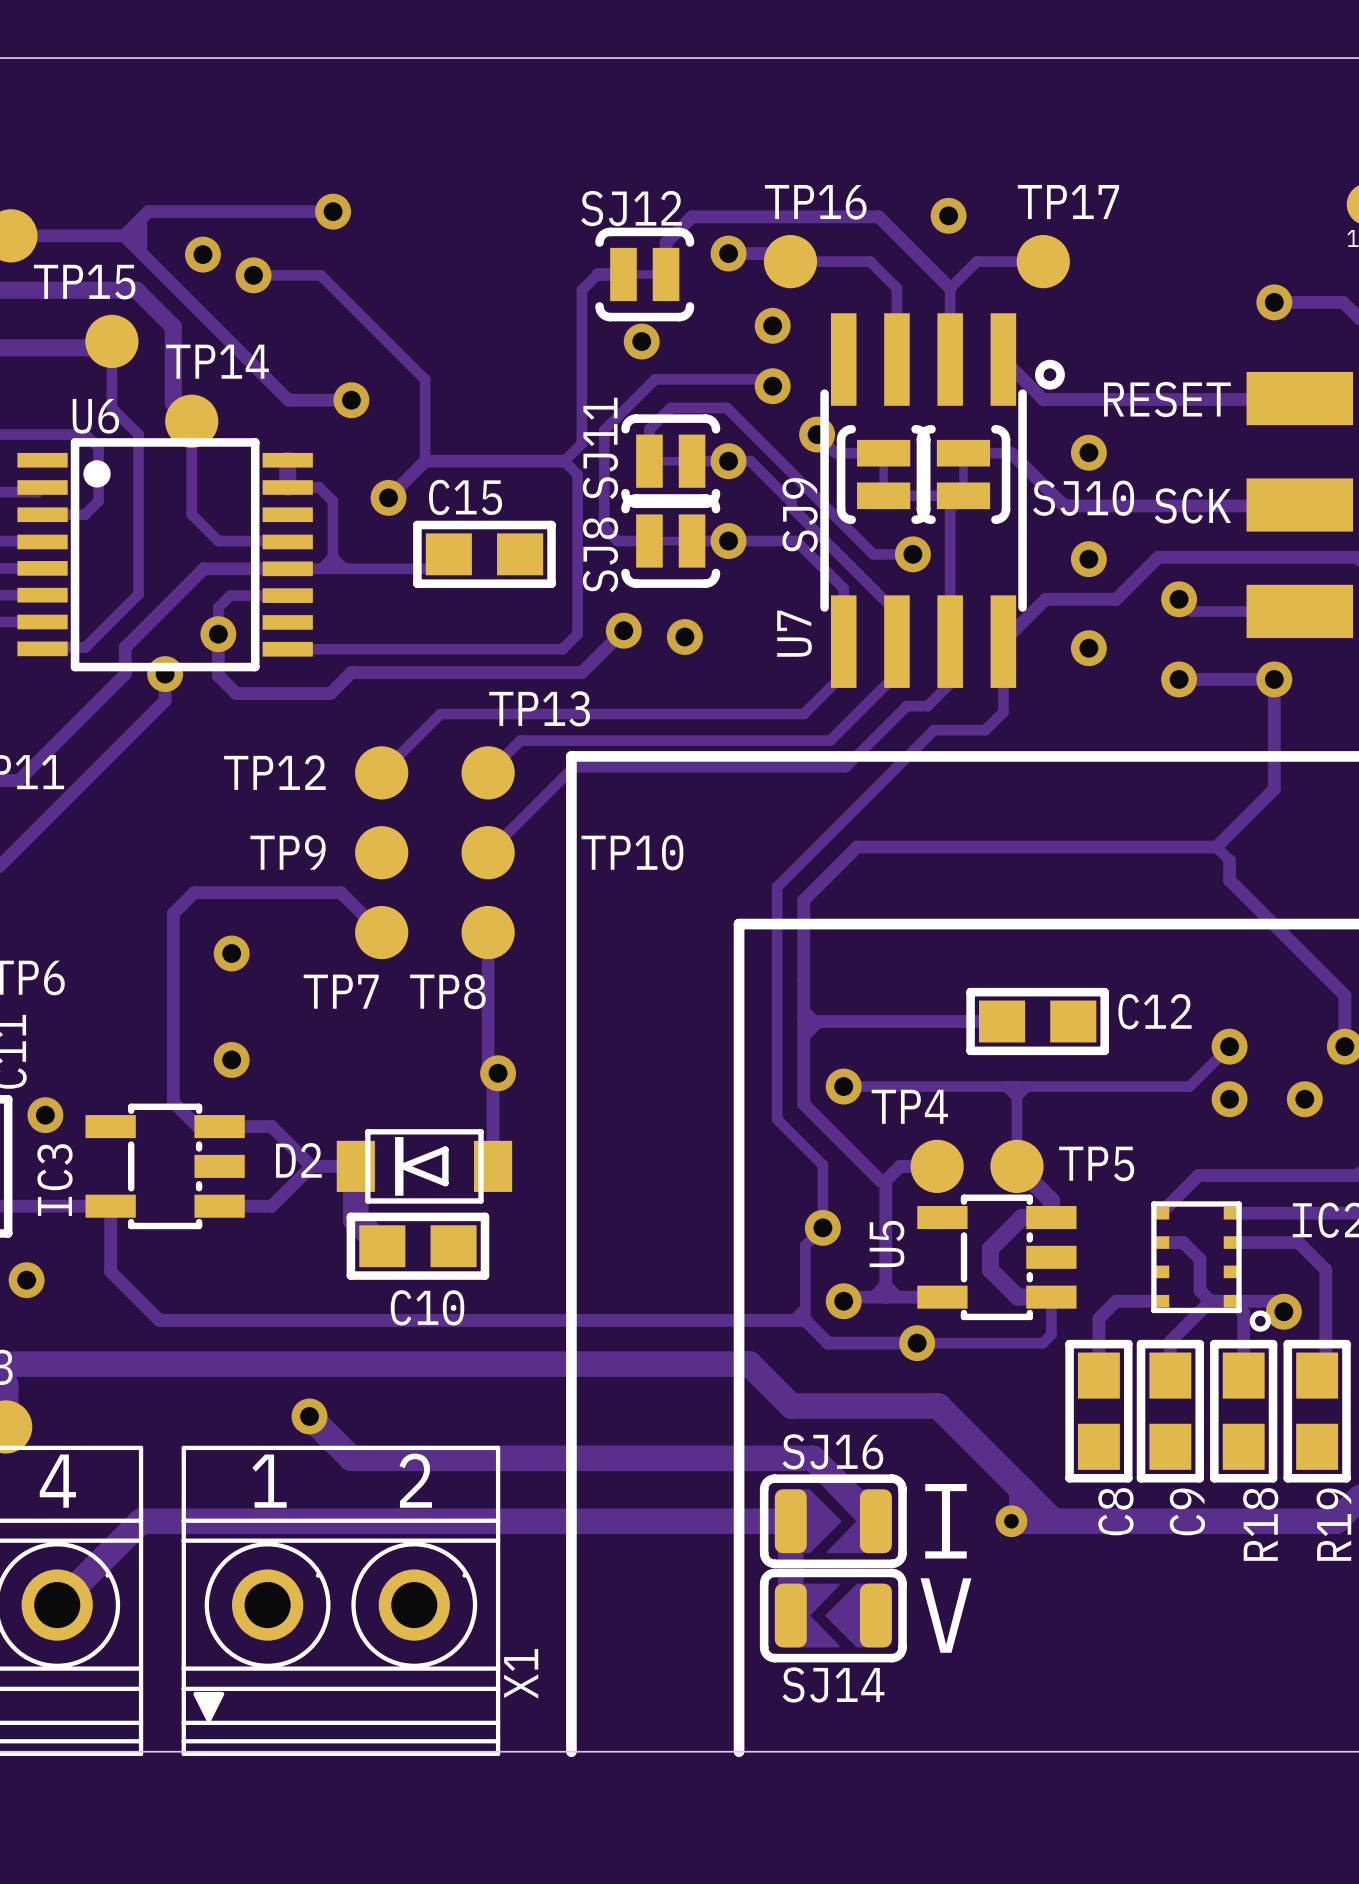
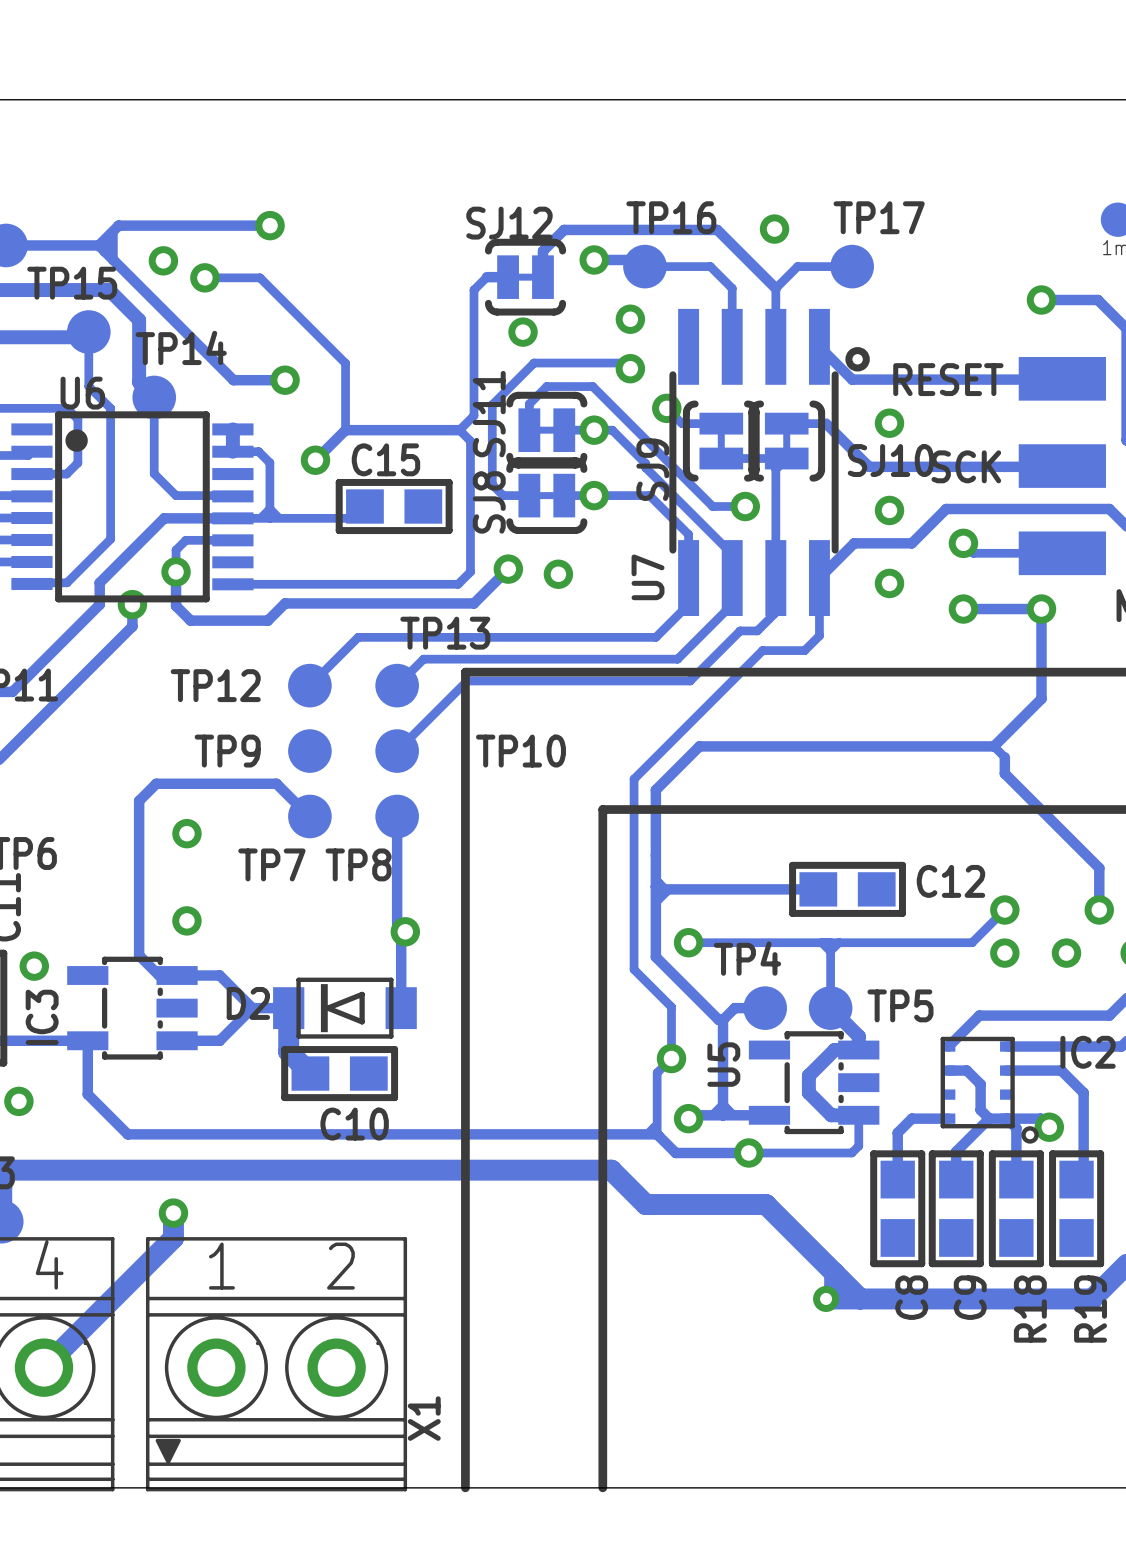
track: (309, 1416) (351, 1458) (813, 1458) (875, 1521) -> none
via position: (309, 1416) -> (173, 1213)
track: (141, 1521) (790, 1521) (790, 1625) -> (112, 1298) (173, 1238) (173, 1213)
SJ16: (833, 1521) -> none
text: I (945, 1521) -> none
SJ14: (833, 1615) -> none
text: V (945, 1615) -> none

